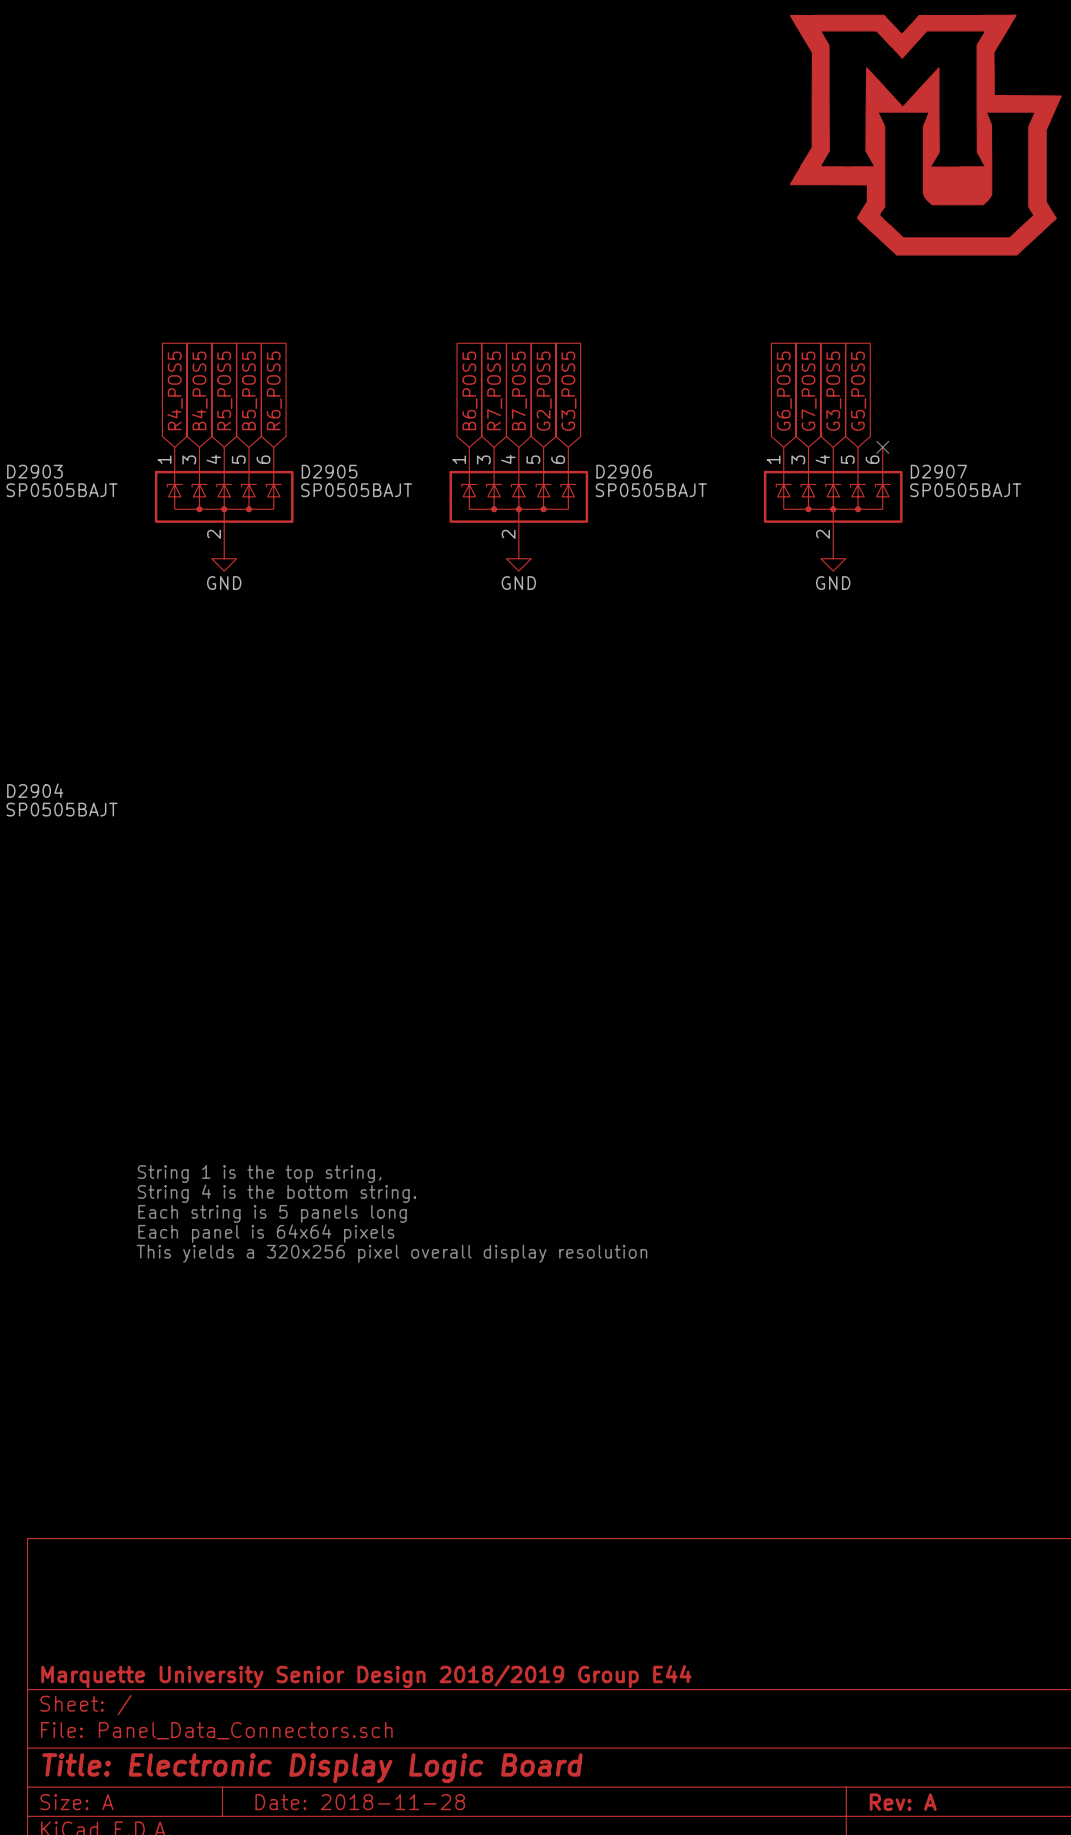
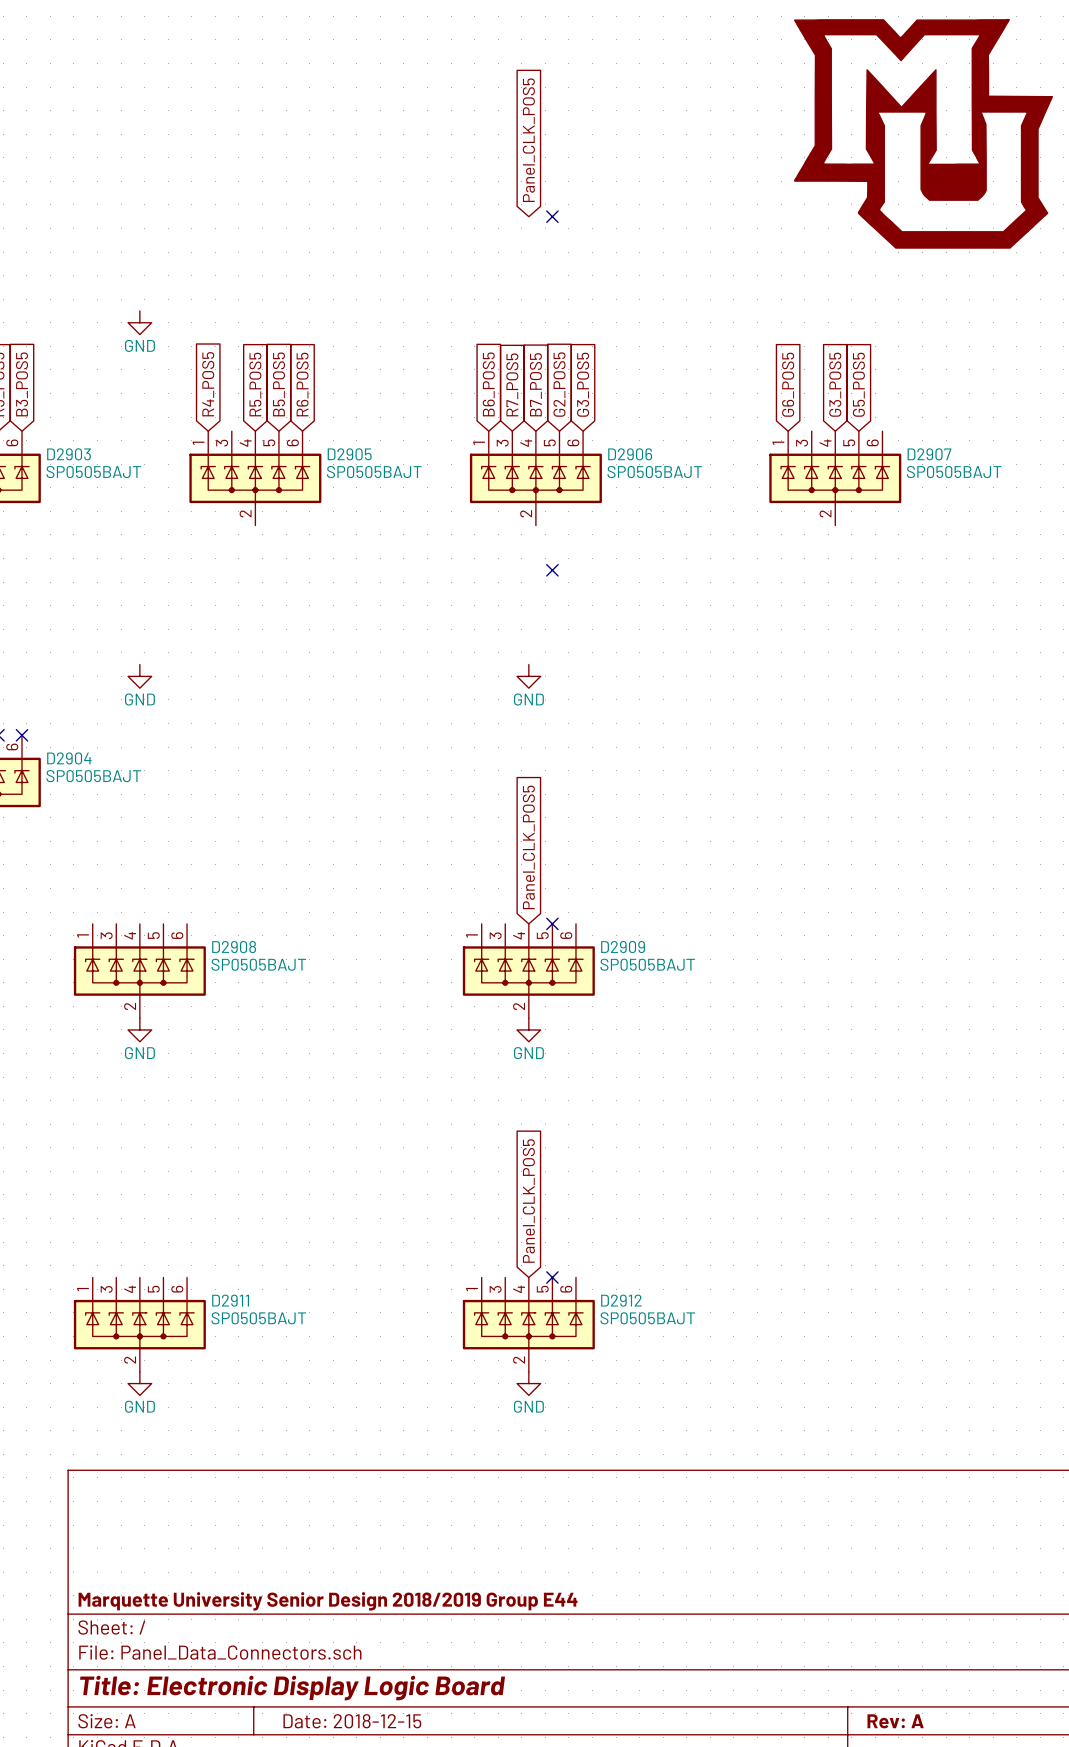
global label: none -> Panel_CLK_POS5 (528, 140)
no-connect mark: none -> (552, 216)
power symbol: none -> GND (139, 322)
global label: B4_POS5 (199, 390) -> none
global label: G7_POS5 (809, 391) -> none
no-connect mark: (882, 447) -> none
power symbol: GND (224, 558) -> none
power symbol position: GND (518, 558) -> GND (528, 676)
power symbol: GND (833, 558) -> none
no-connect mark: none -> (552, 570)
power symbol: none -> GND (139, 676)
global label: none -> Panel_CLK_POS5 (528, 847)
no-connect mark: none -> (552, 923)
D2908: none -> SP0505BAJT (139, 971)
D2909: none -> SP0505BAJT (528, 971)
power symbol: none -> GND (139, 1029)
power symbol: none -> GND (528, 1029)
text: String 1 is the top string, (259, 1174) -> none
text: String 4 is the bottom string. (276, 1193) -> none
text: Each string is 5 panels long (272, 1213) -> none
text: Each panel is 64x64 pixels (266, 1233) -> none
global label: none -> Panel_CLK_POS5 (528, 1201)
text: This yields a 320x256 pixel overall display resolution (391, 1253) -> none
no-connect mark: none -> (552, 1277)
D2911: none -> SP0505BAJT (139, 1324)
D2912: none -> SP0505BAJT (528, 1324)
power symbol: none -> GND (139, 1383)
power symbol: none -> GND (528, 1383)
title block: Date: 2018-11-28 (360, 1802) -> Date: 2018-12-15 (352, 1721)

